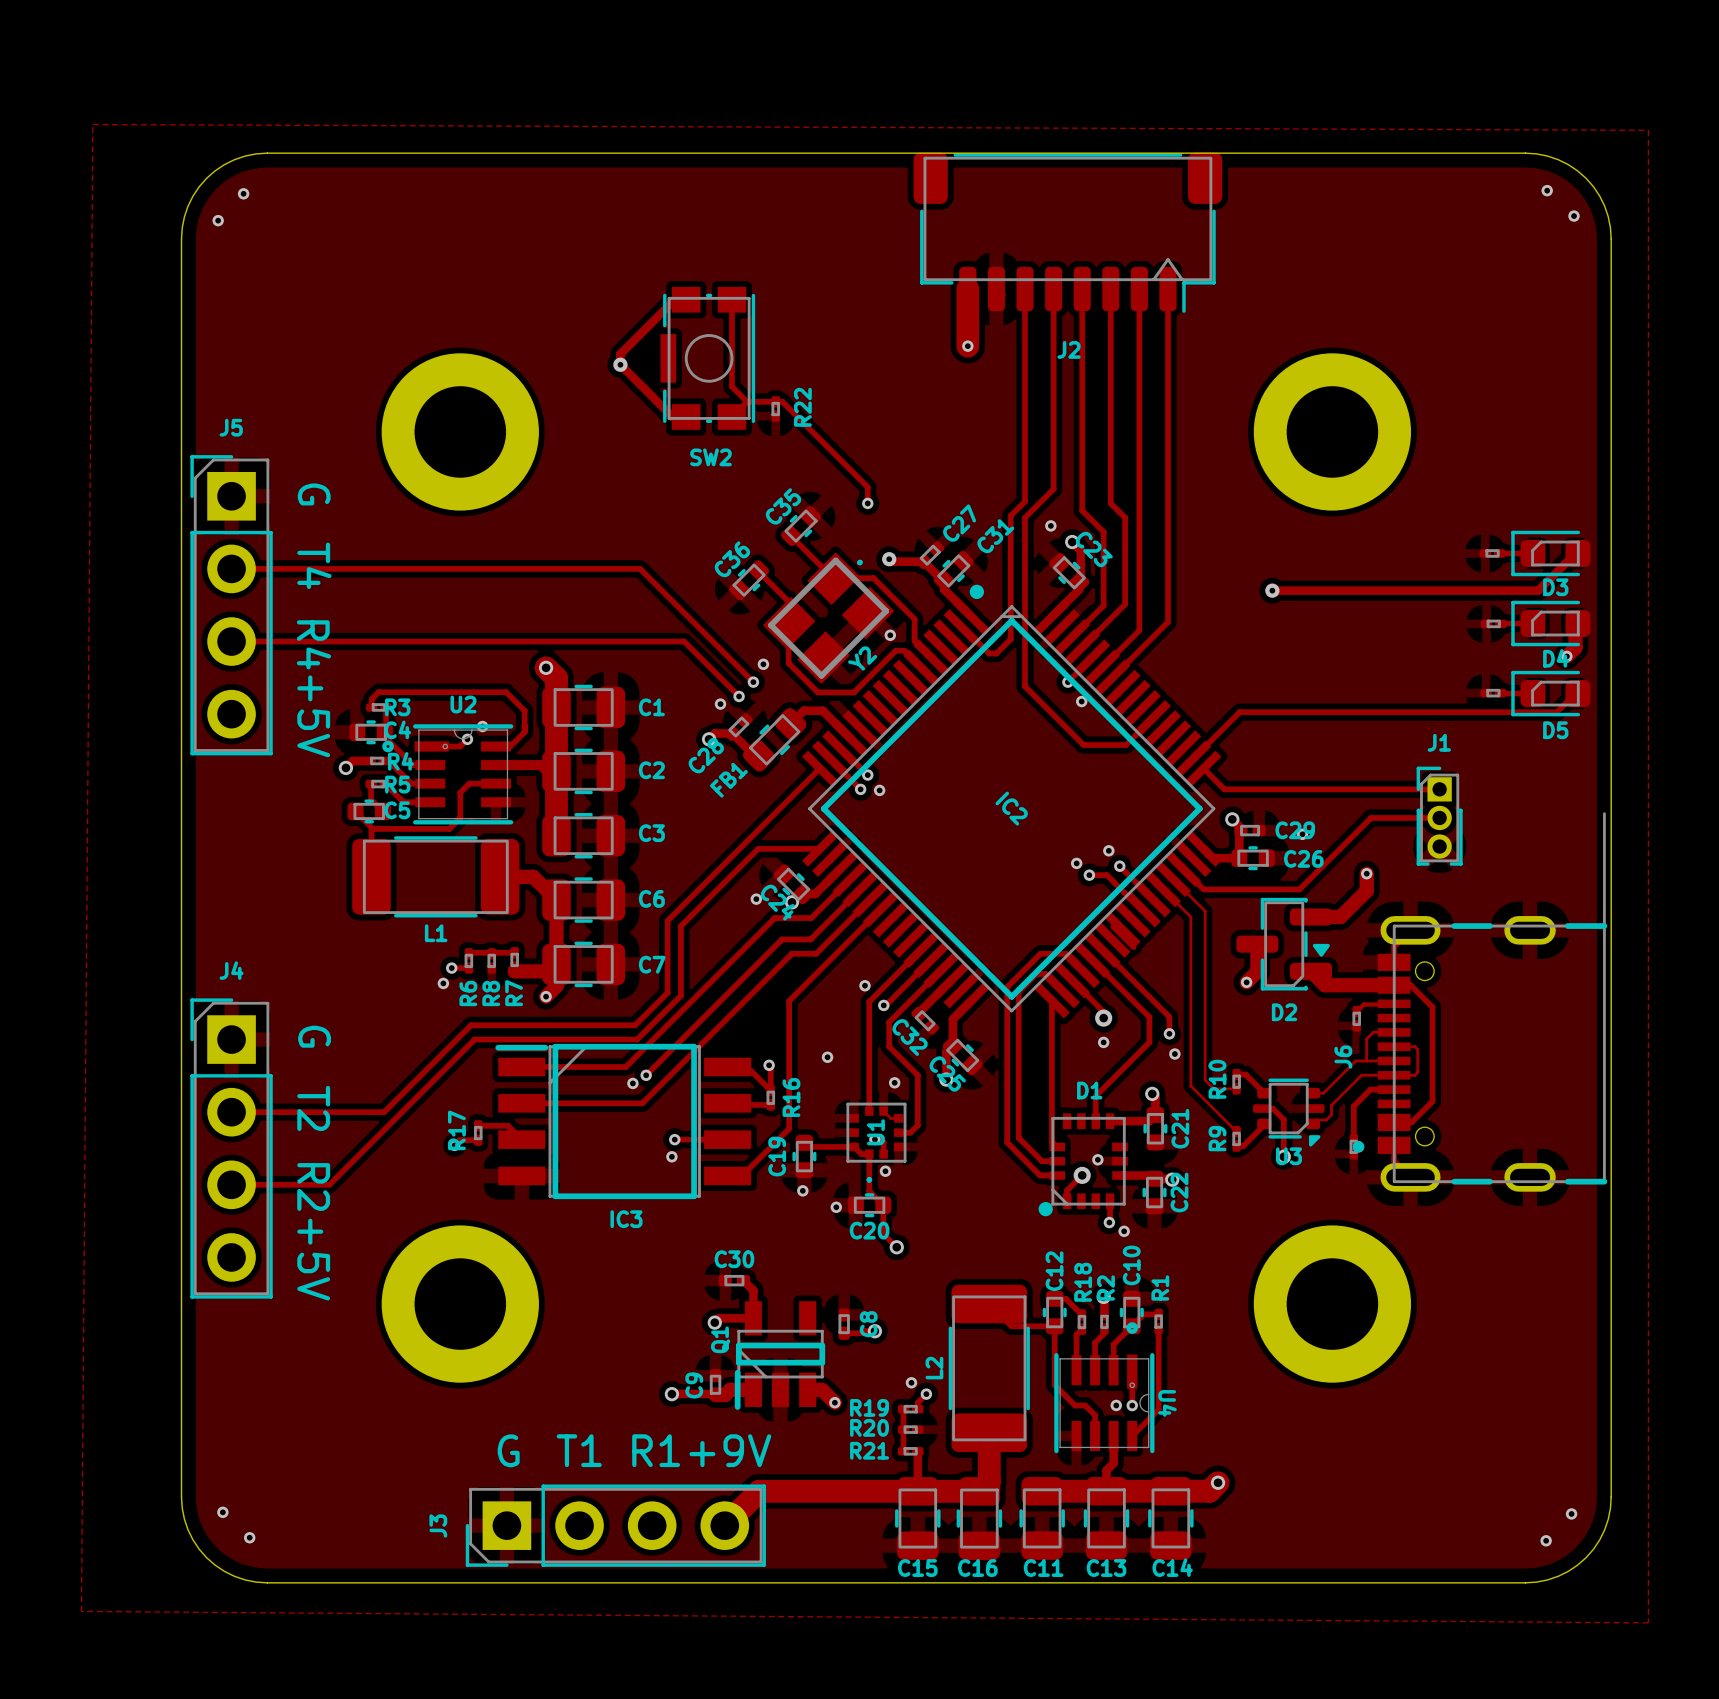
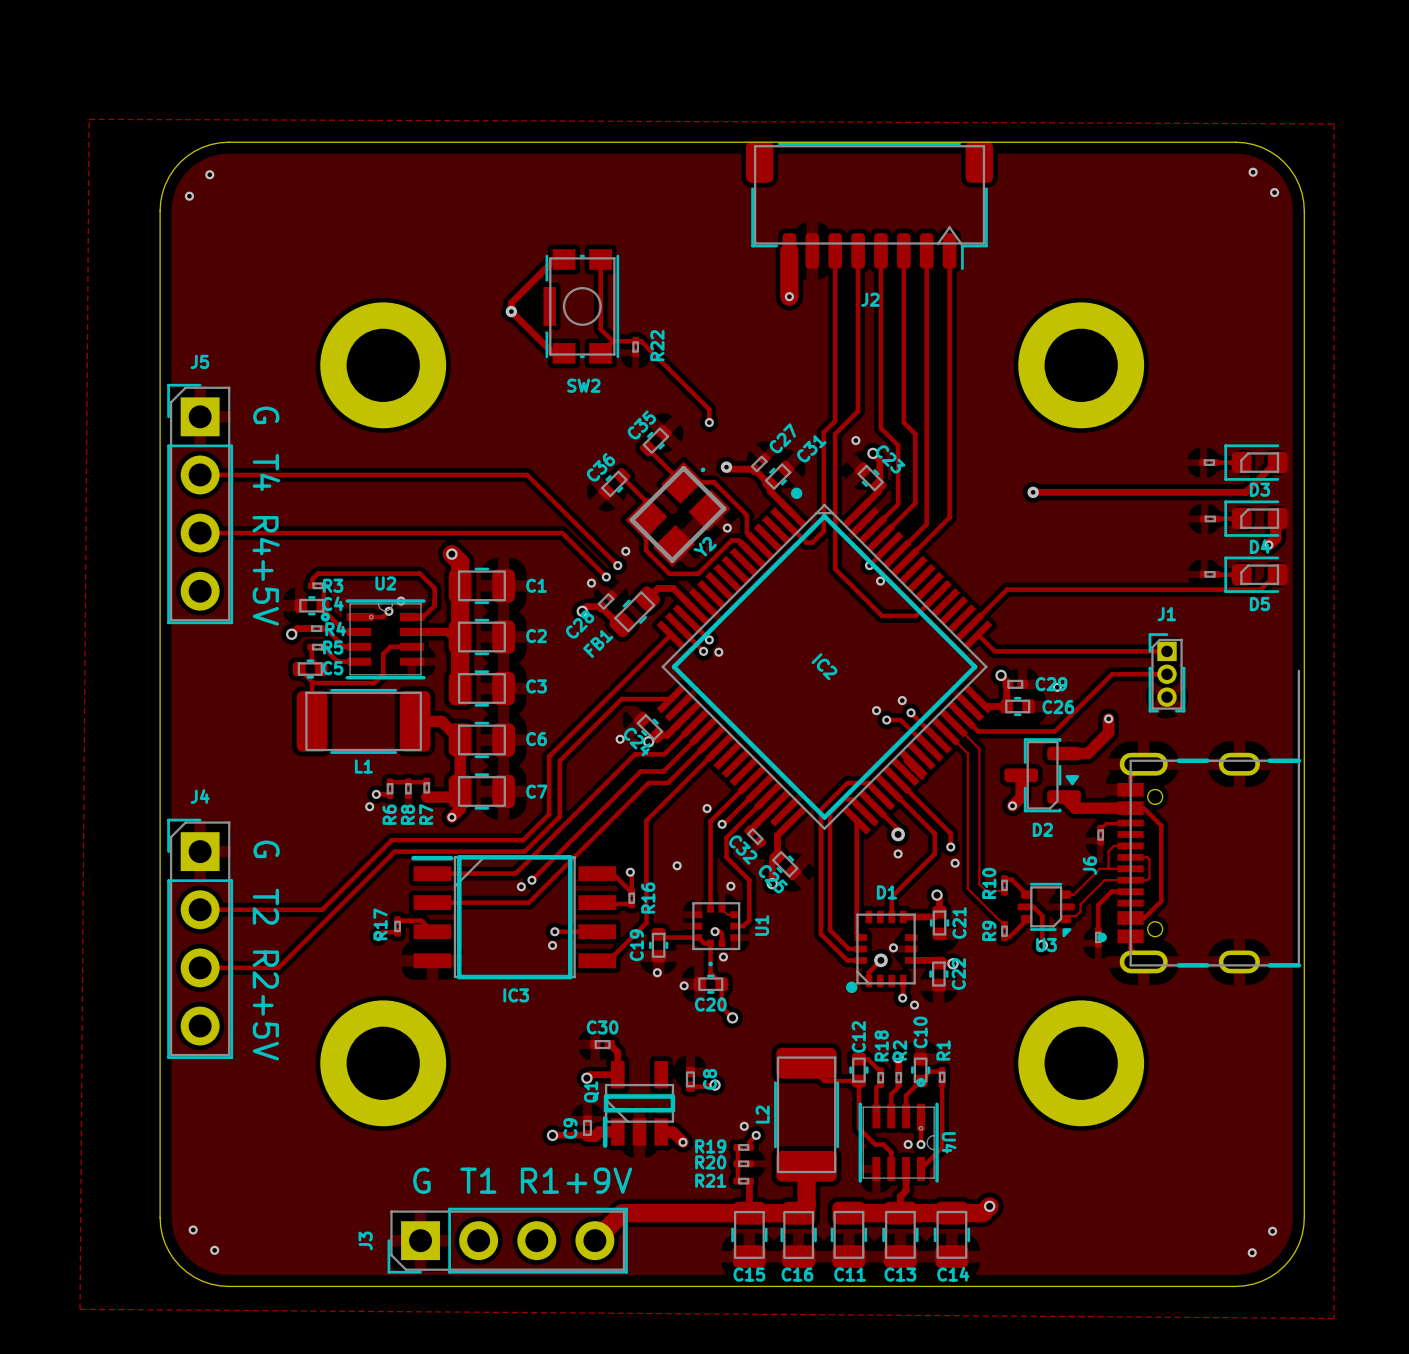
U1 name position: U1 (875, 1132) -> U1 (762, 925)

